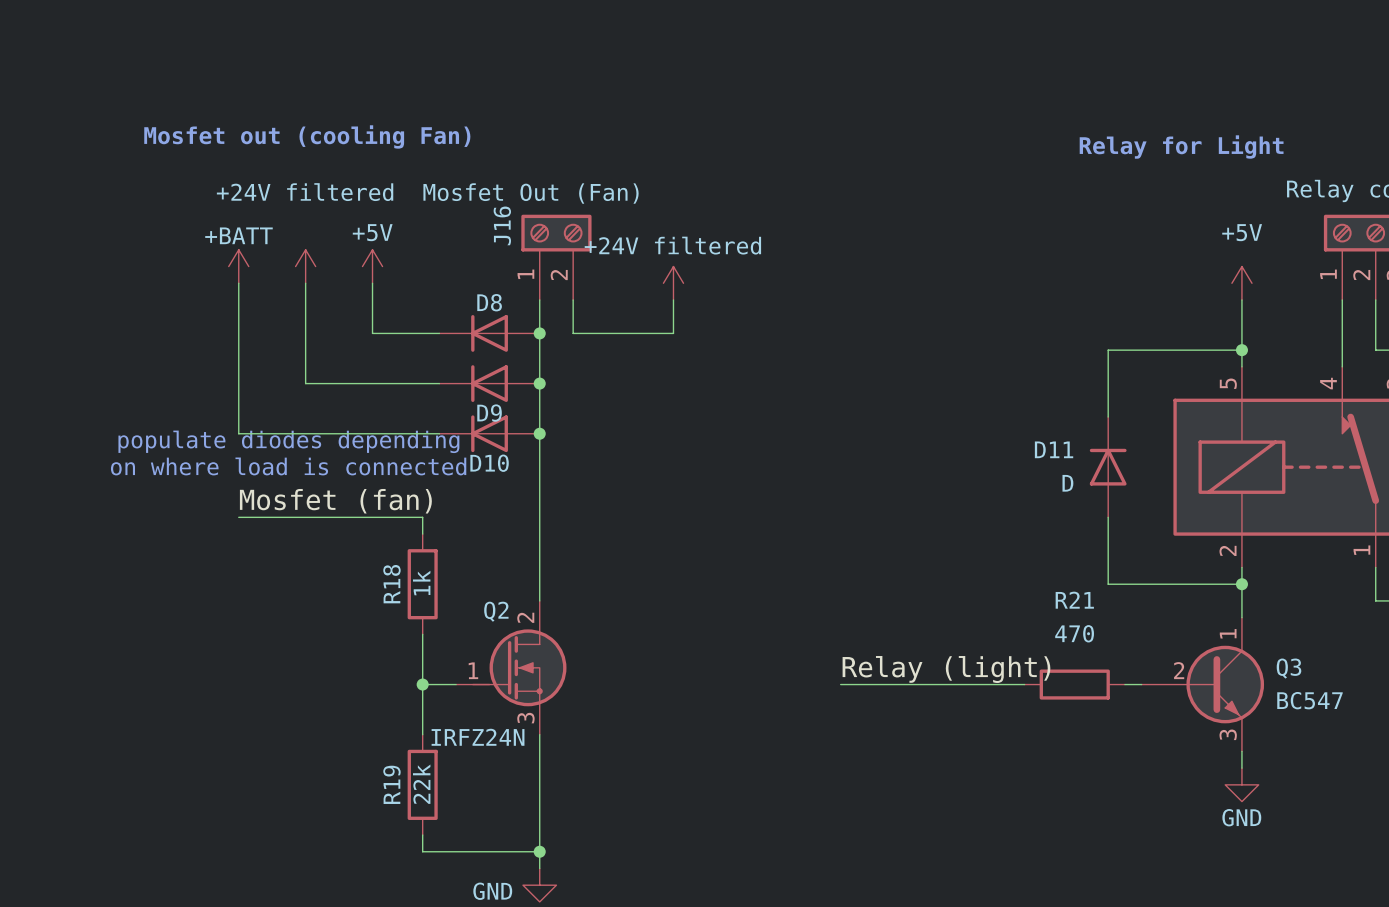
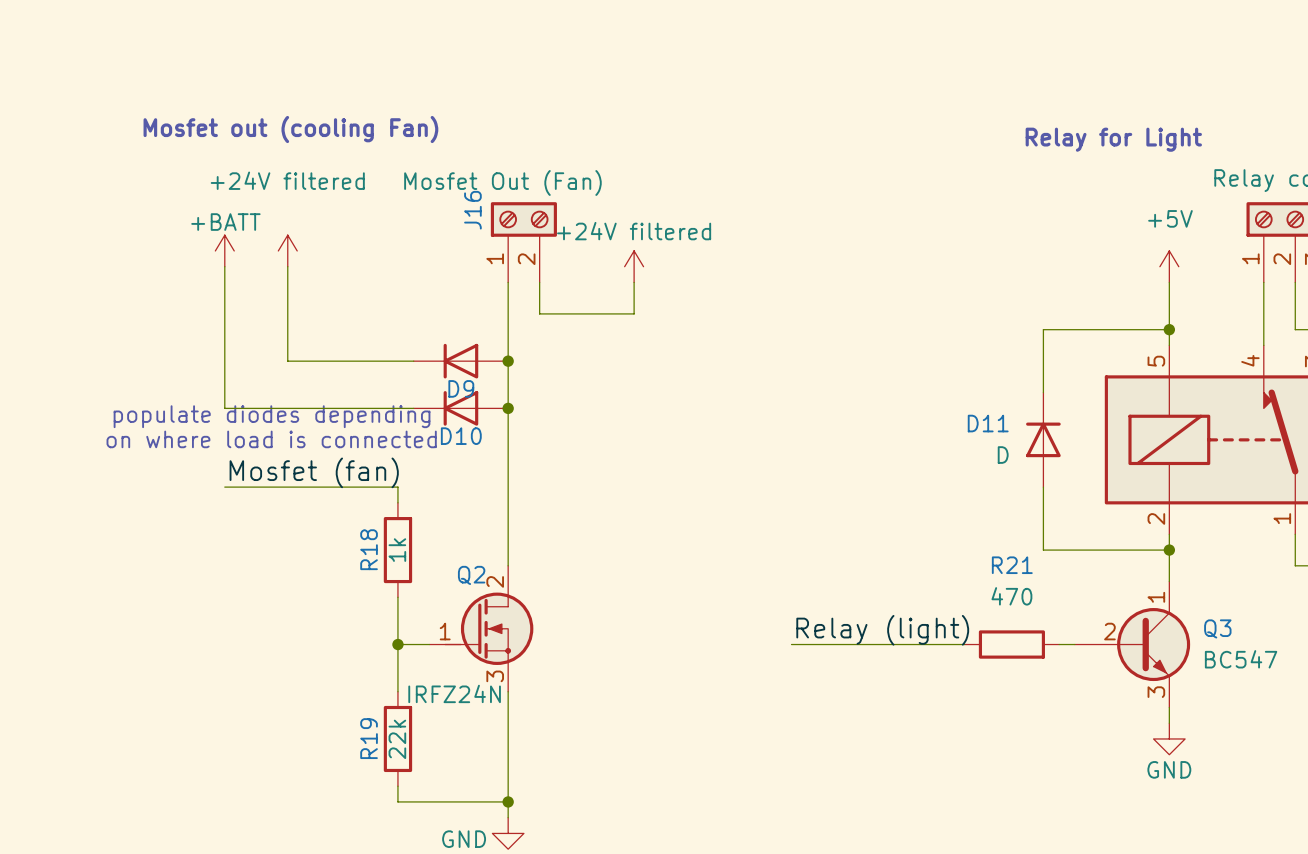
power symbol: +5V (372, 266) -> none
wire: (372, 283) (372, 333) (439, 333) -> none
D8: (489, 333) -> none
junction: (539, 333) -> none

